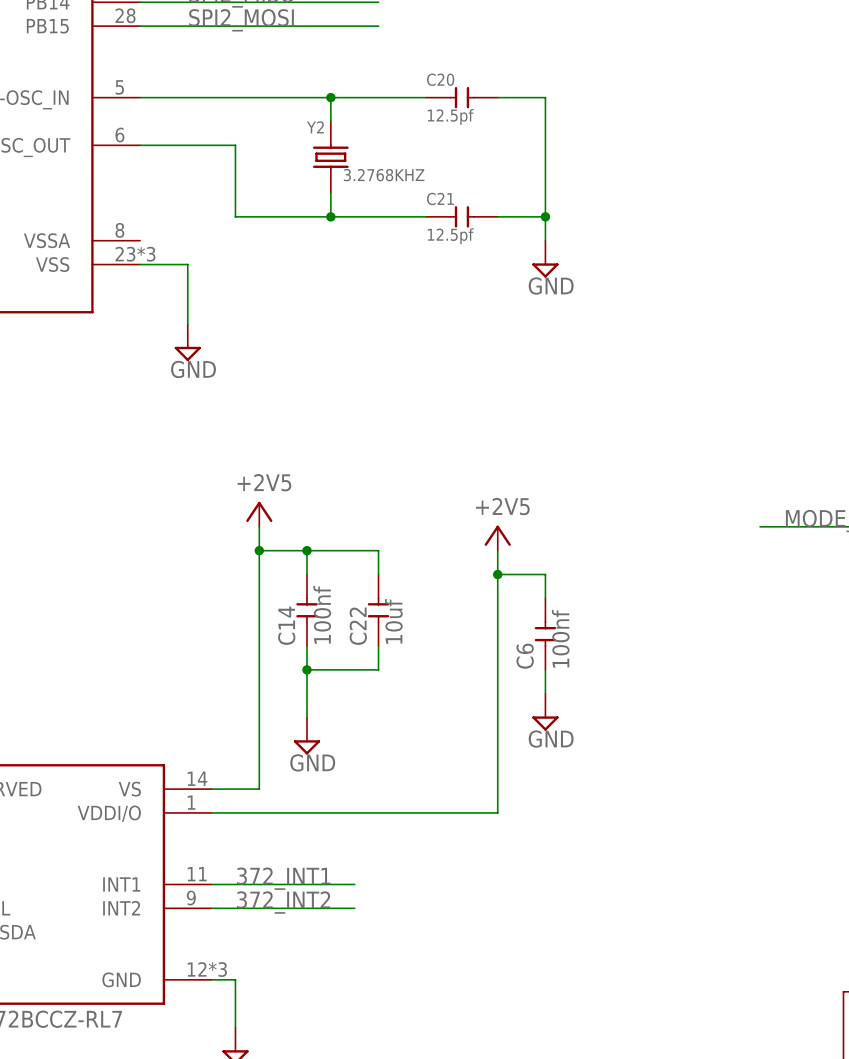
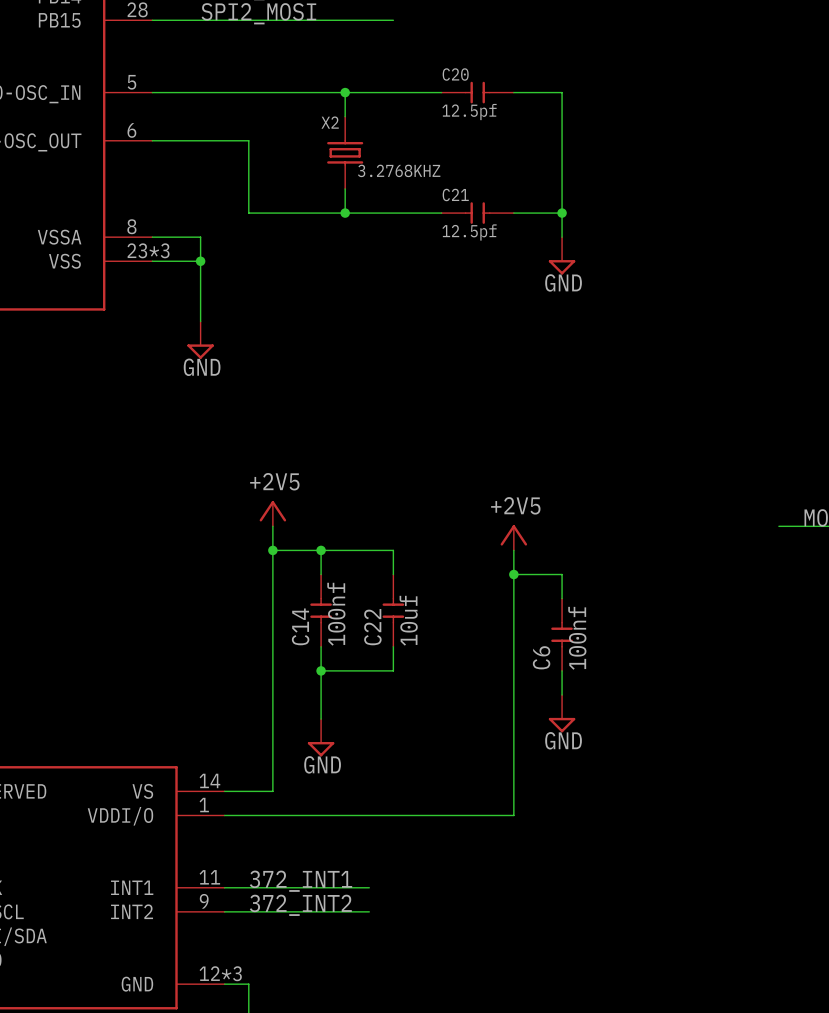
Y2 name: Y2 (315, 127) -> X2 (330, 122)
wire: none -> (152, 237) (200, 237) (200, 261)
junction: none -> (200, 261)

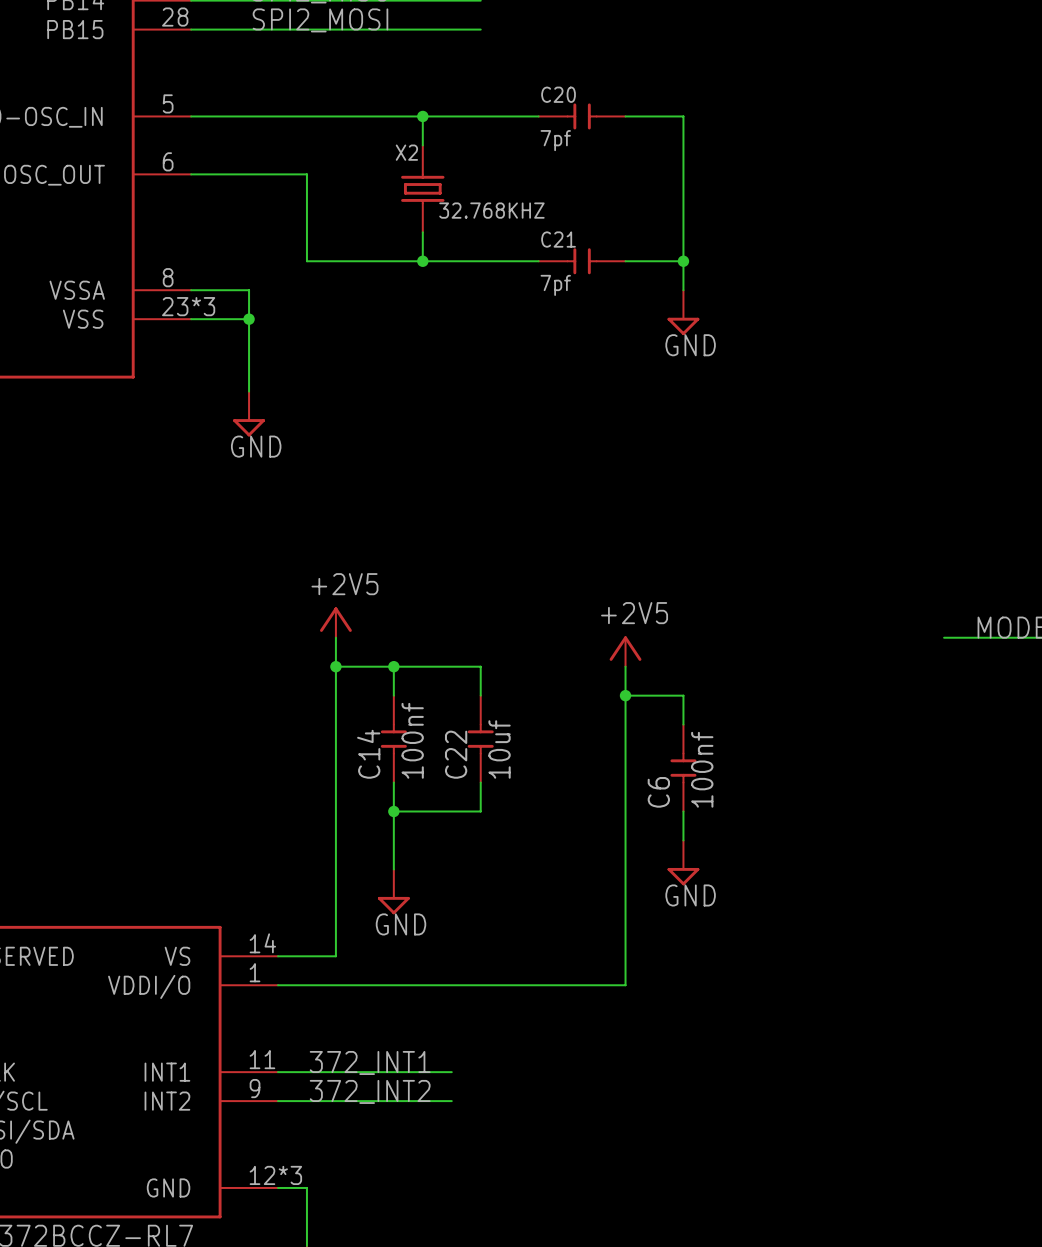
C20 value: 12.5pf (469, 112) -> 7pf (555, 140)
X2 value: 3.2768KHZ (399, 170) -> 32.768KHZ (491, 210)
C21 value: 12.5pf (469, 232) -> 7pf (555, 285)

